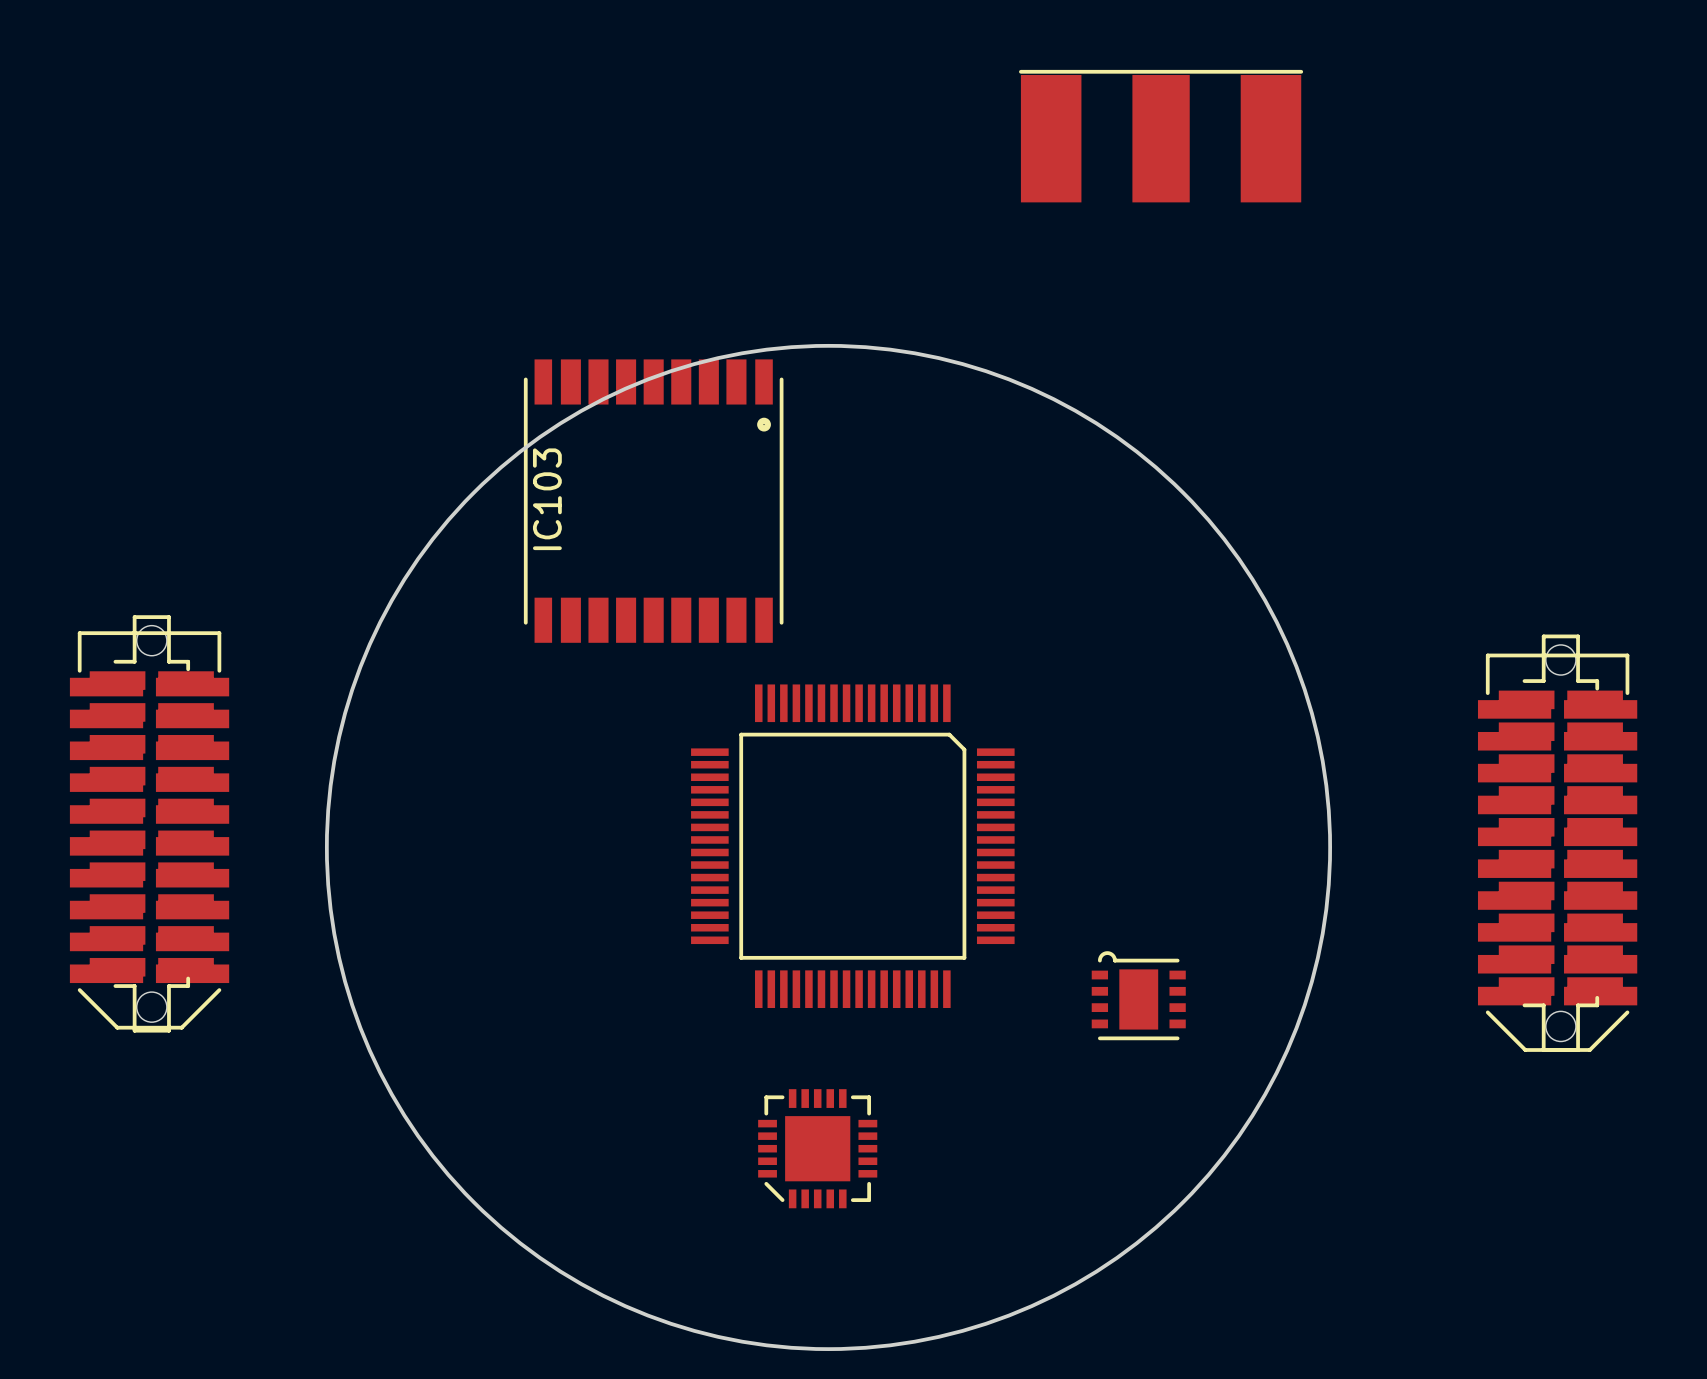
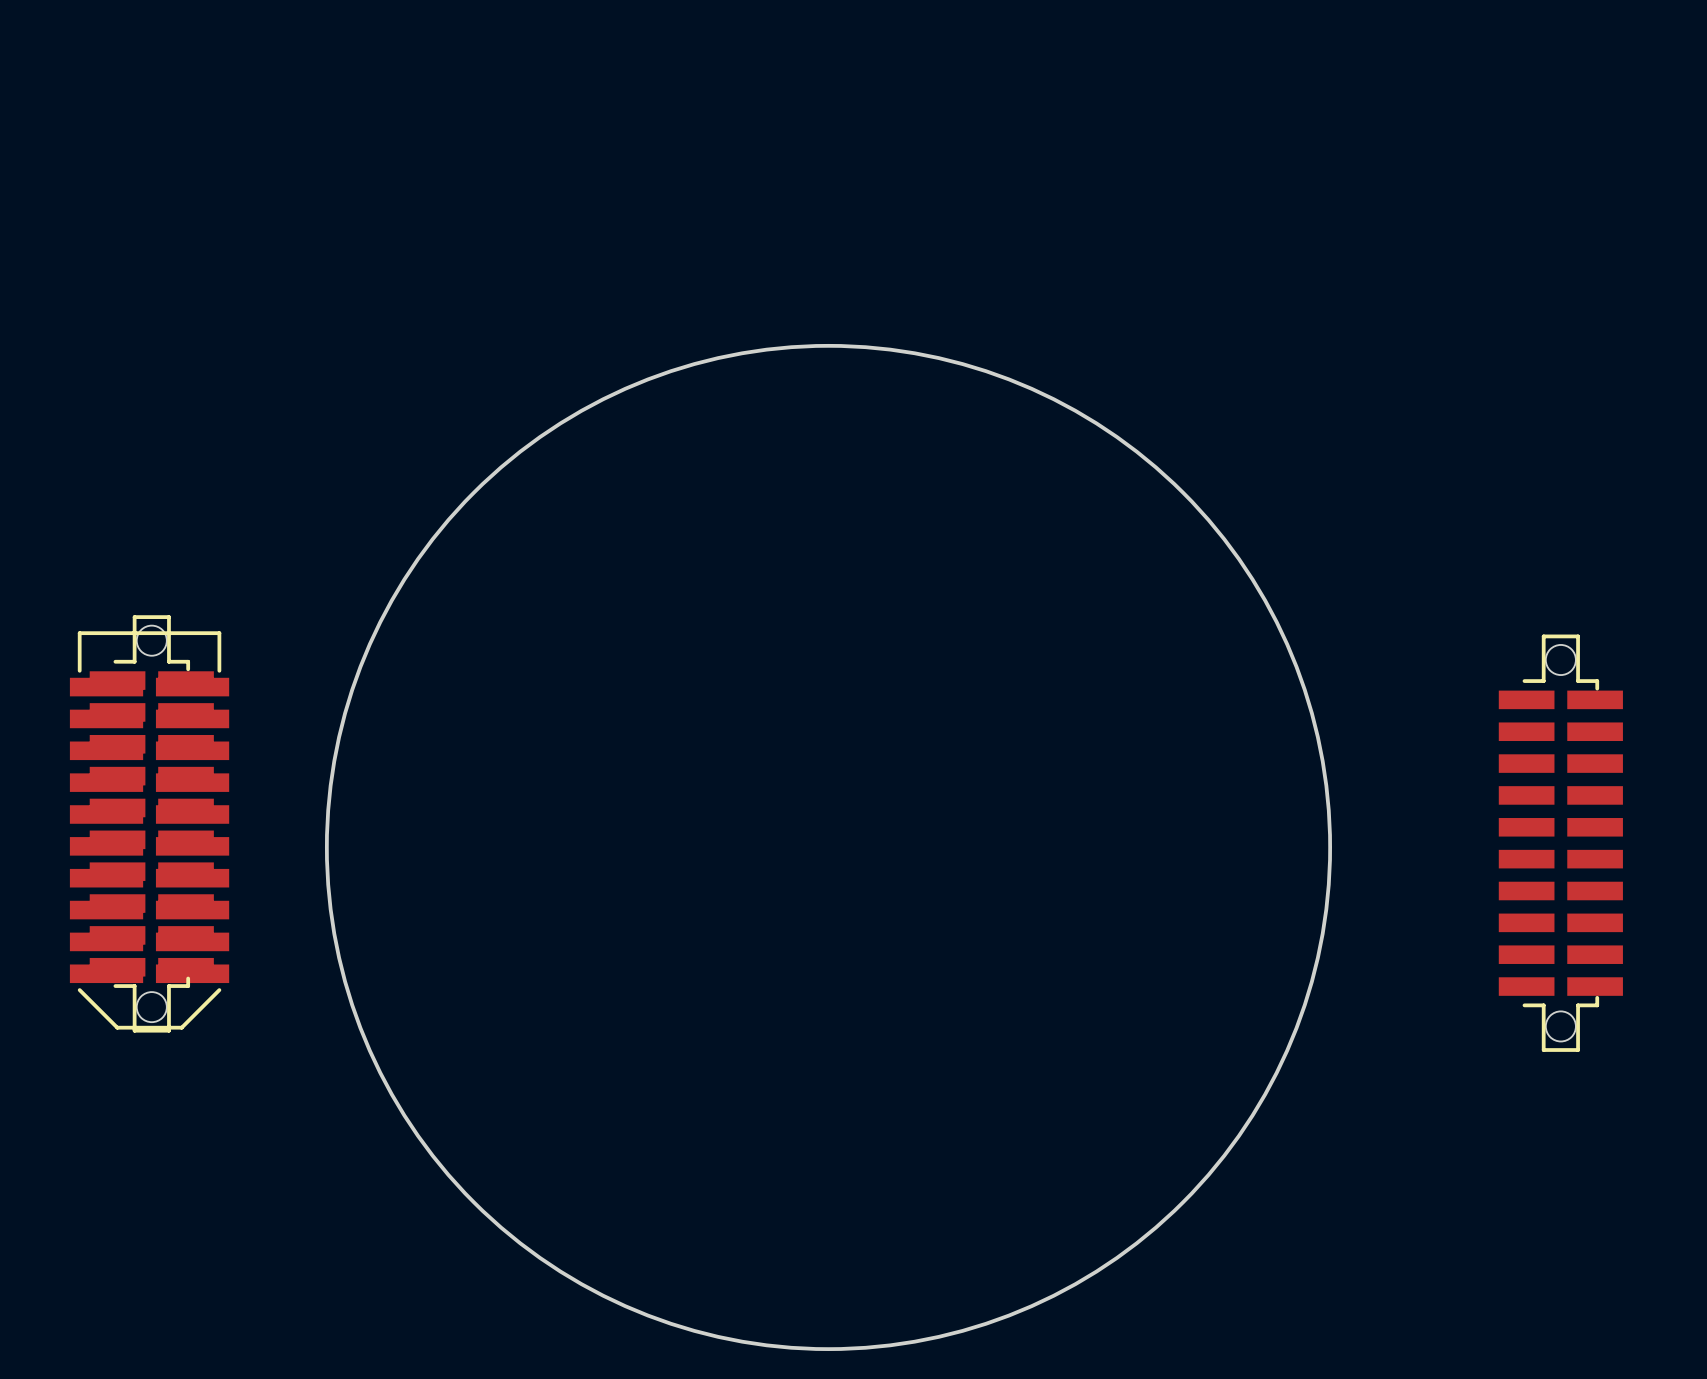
part: (1161, 136) -> none
IC103: (653, 501) -> none
part: (852, 846) -> none
part: (1557, 852) -> none
part: (1138, 995) -> none
part: (817, 1148) -> none

